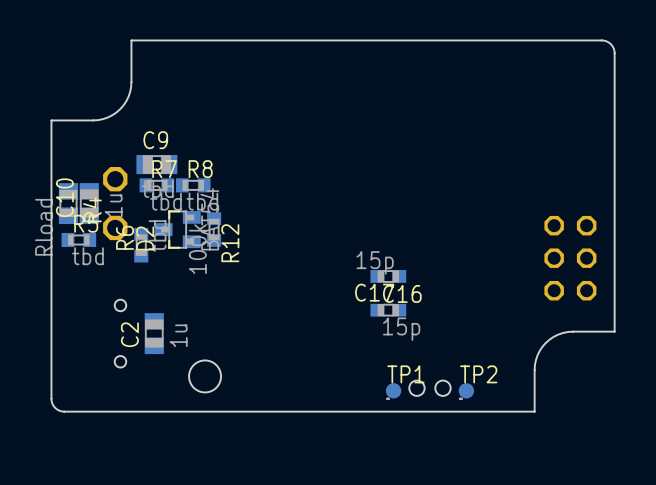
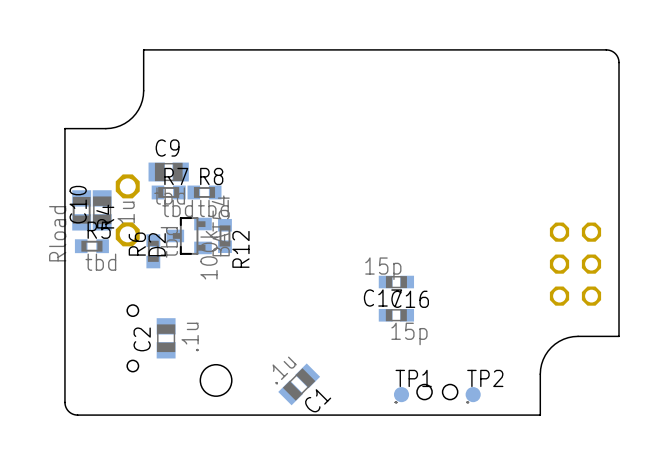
C2 value: 1u (178, 335) -> .1u (190, 337)
C1: none -> .1u (299, 384)

